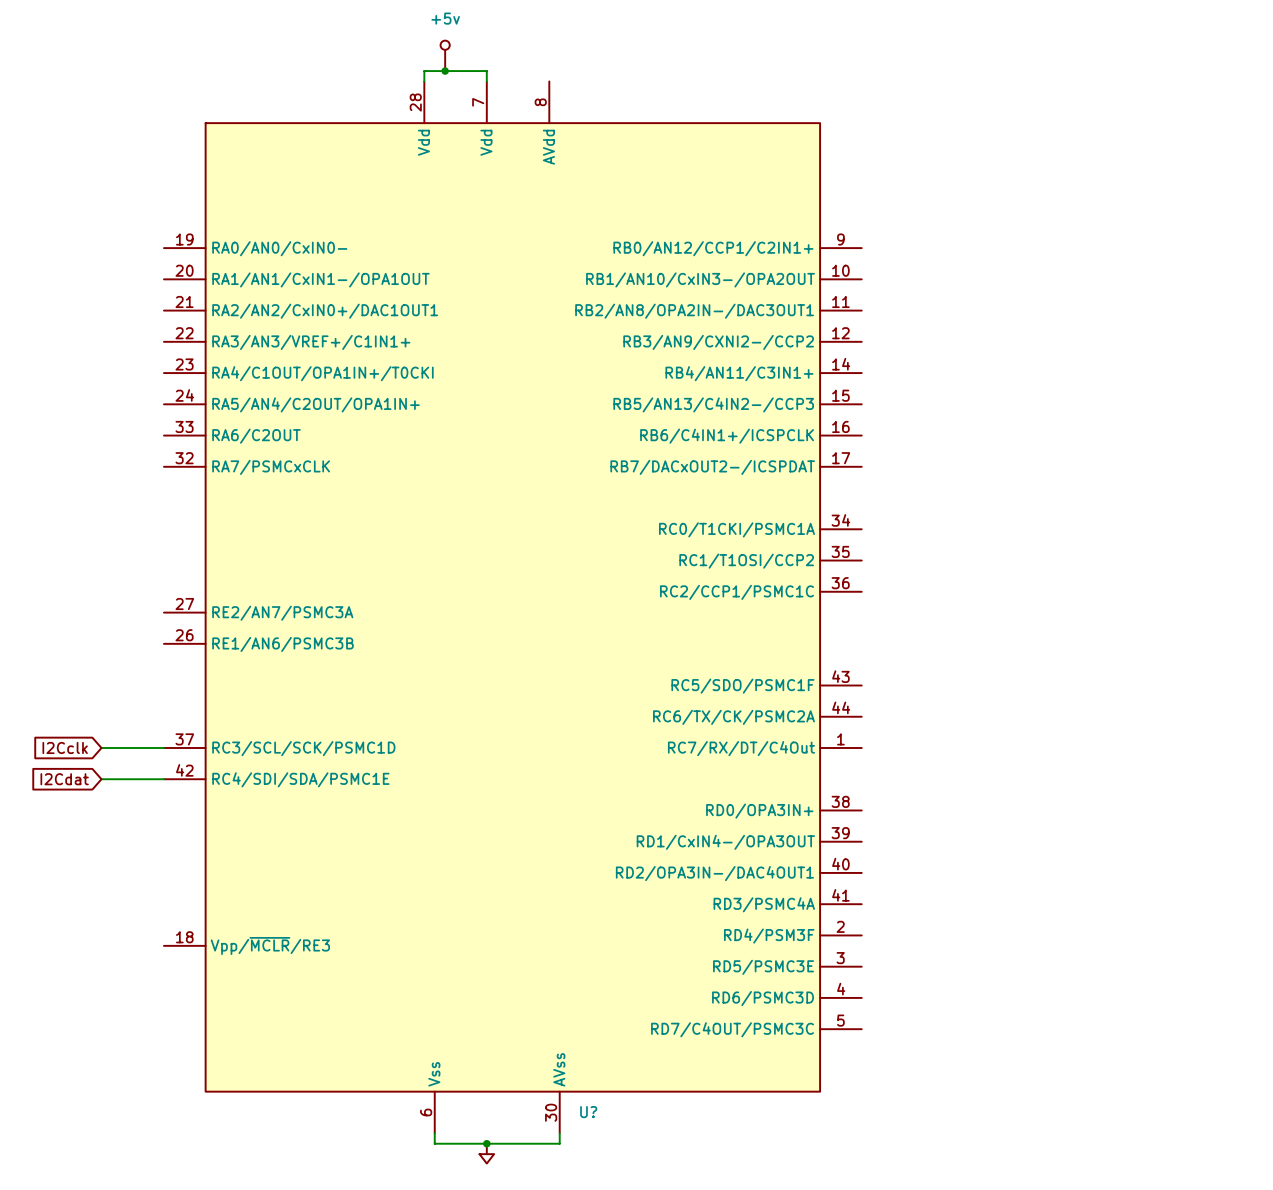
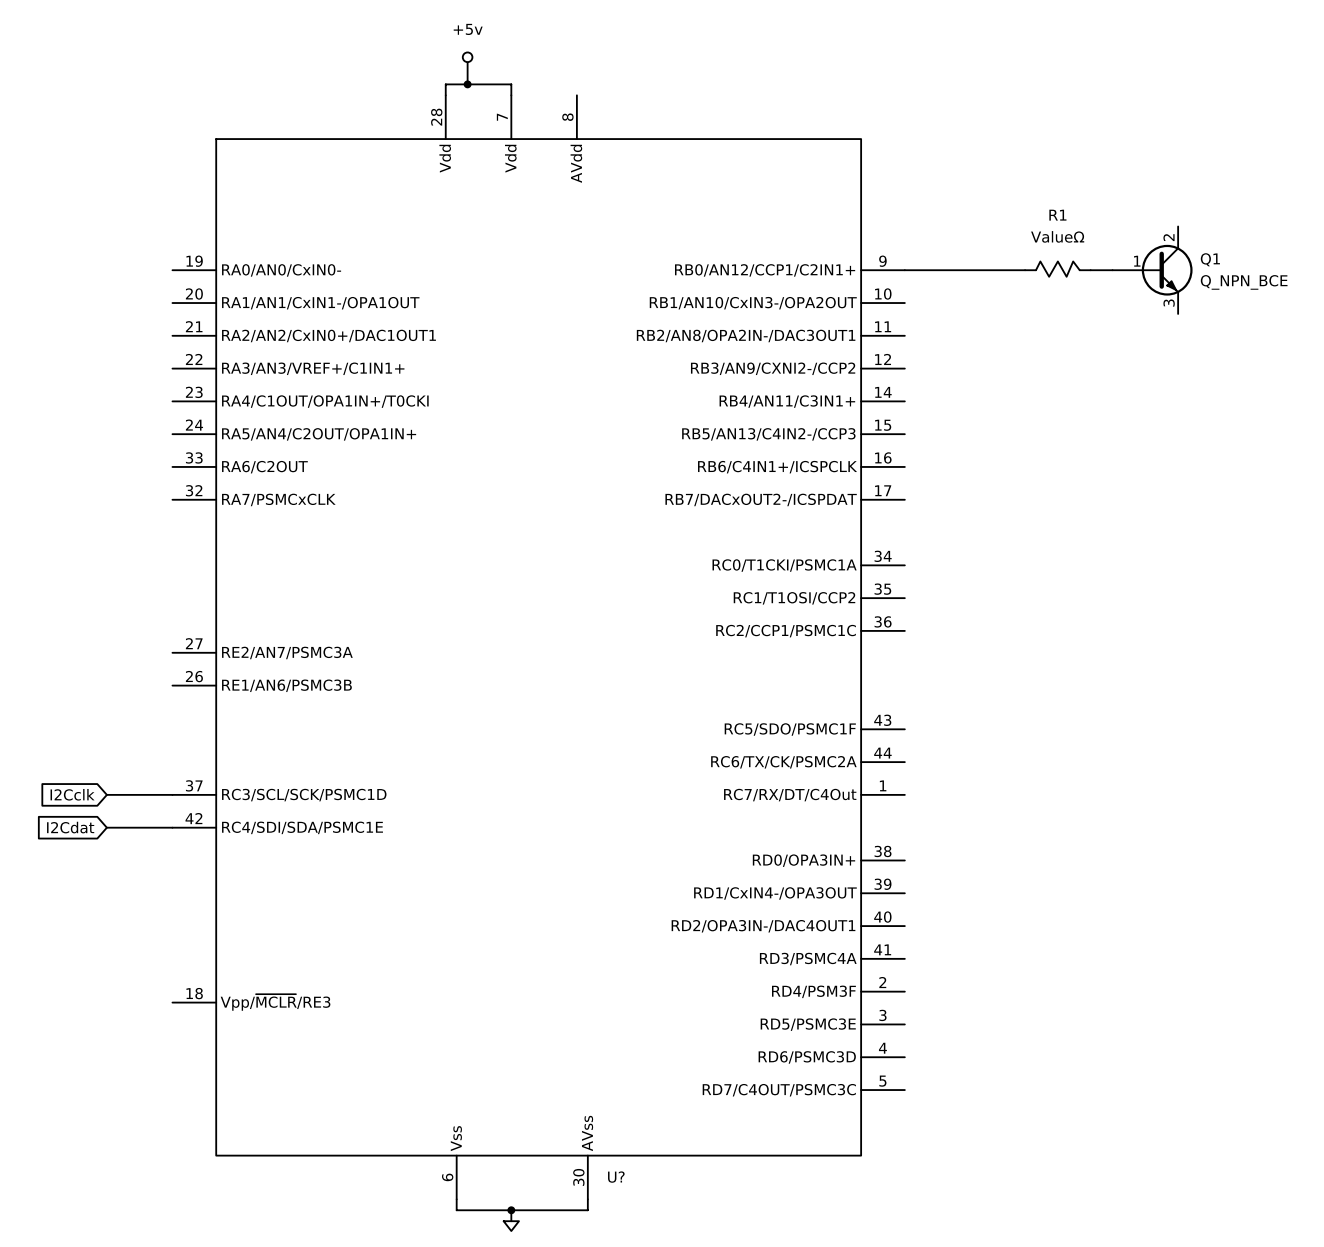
R1: none -> ValueΩ (1057, 269)
wire: none -> (904, 270) (1025, 270)
wire: none -> (1090, 270) (1112, 270)
Q1: none -> Q_NPN_BCE (1152, 270)

